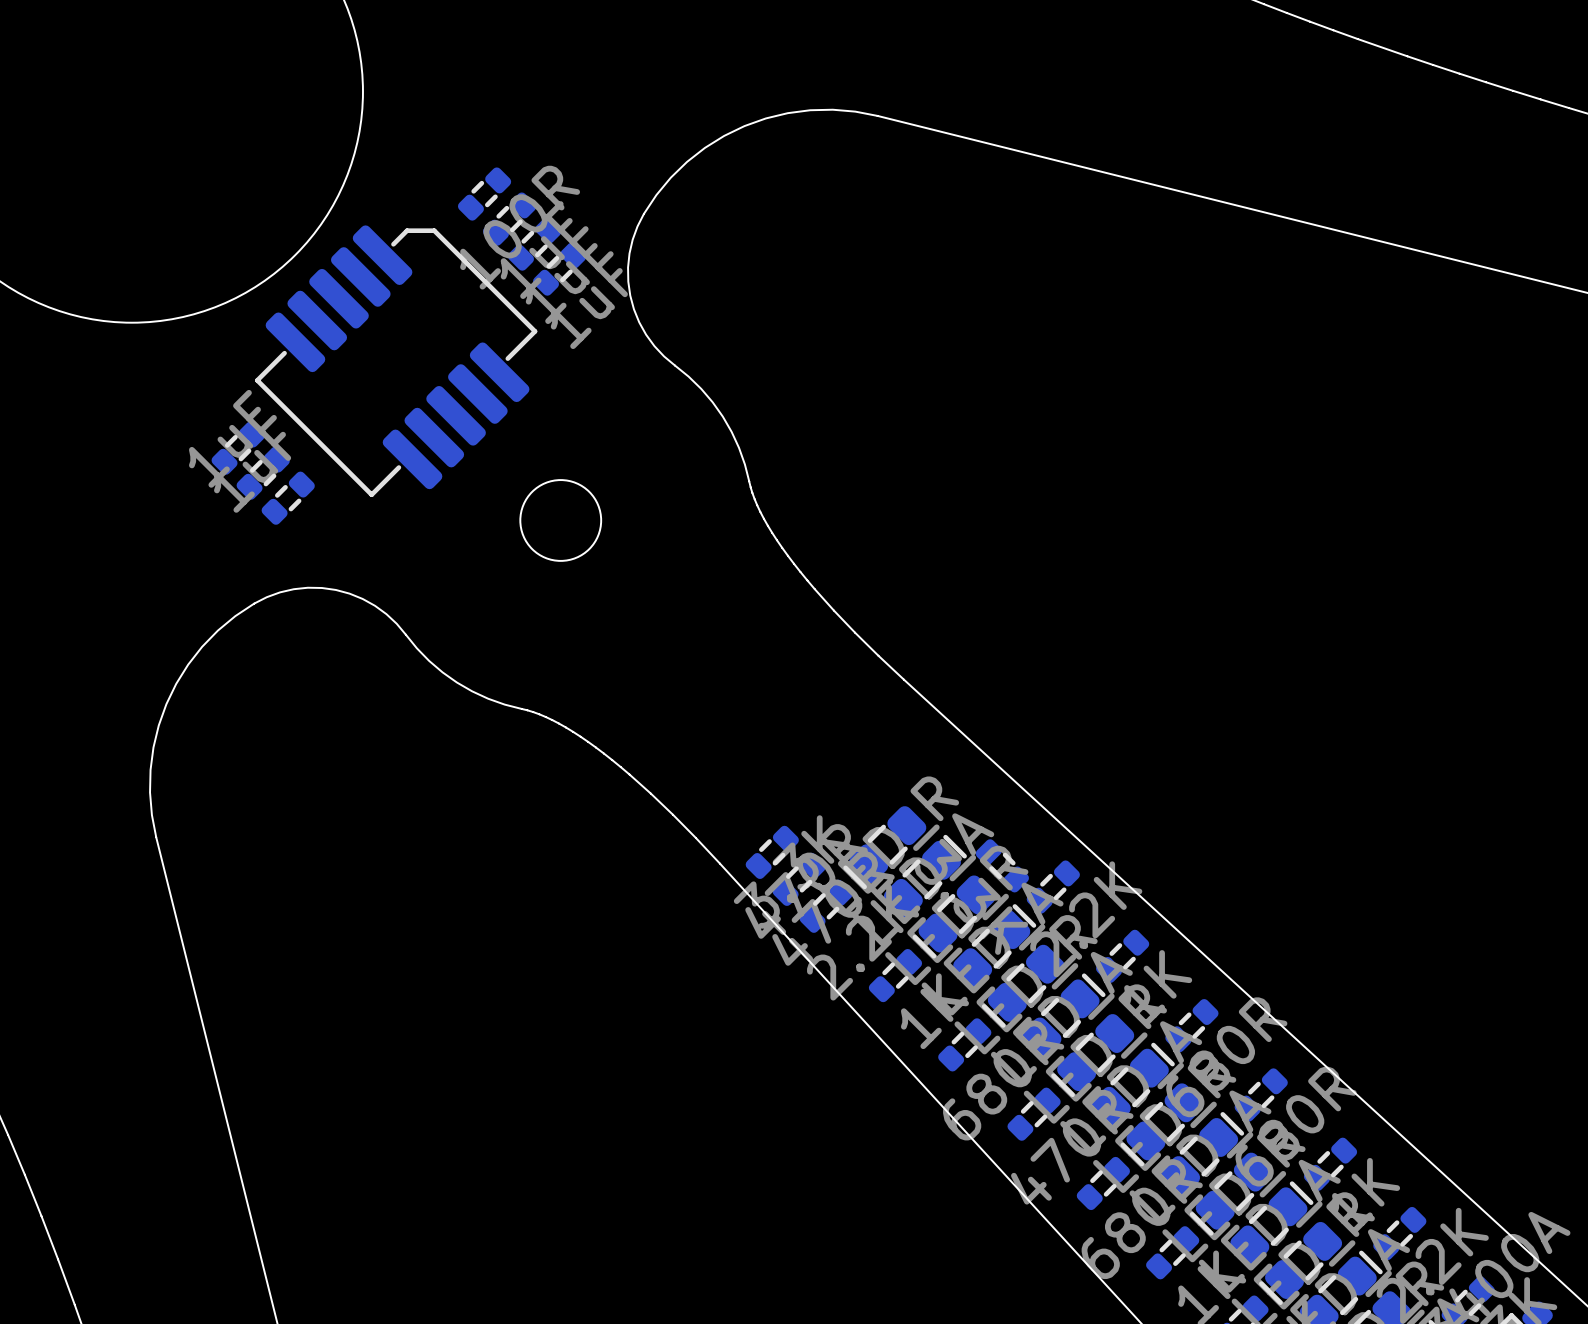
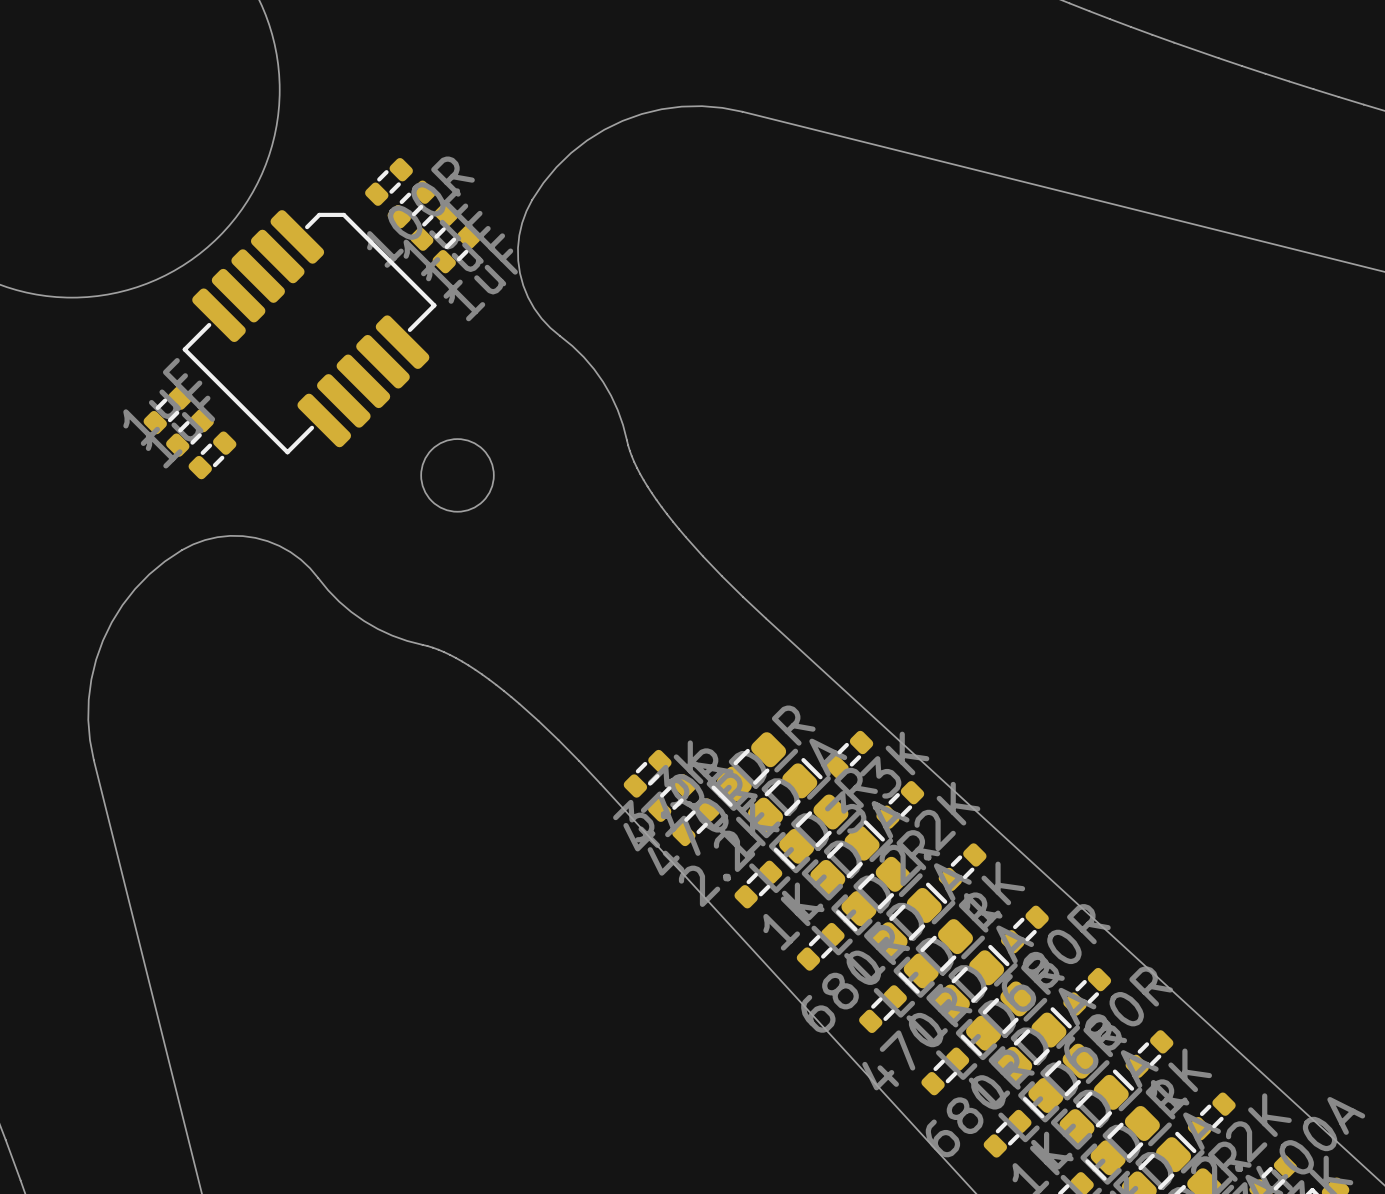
part rotation: 0° (1002, 865) -> 90° clockwise (849, 754)
part position: (1002, 865) -> (849, 754)

